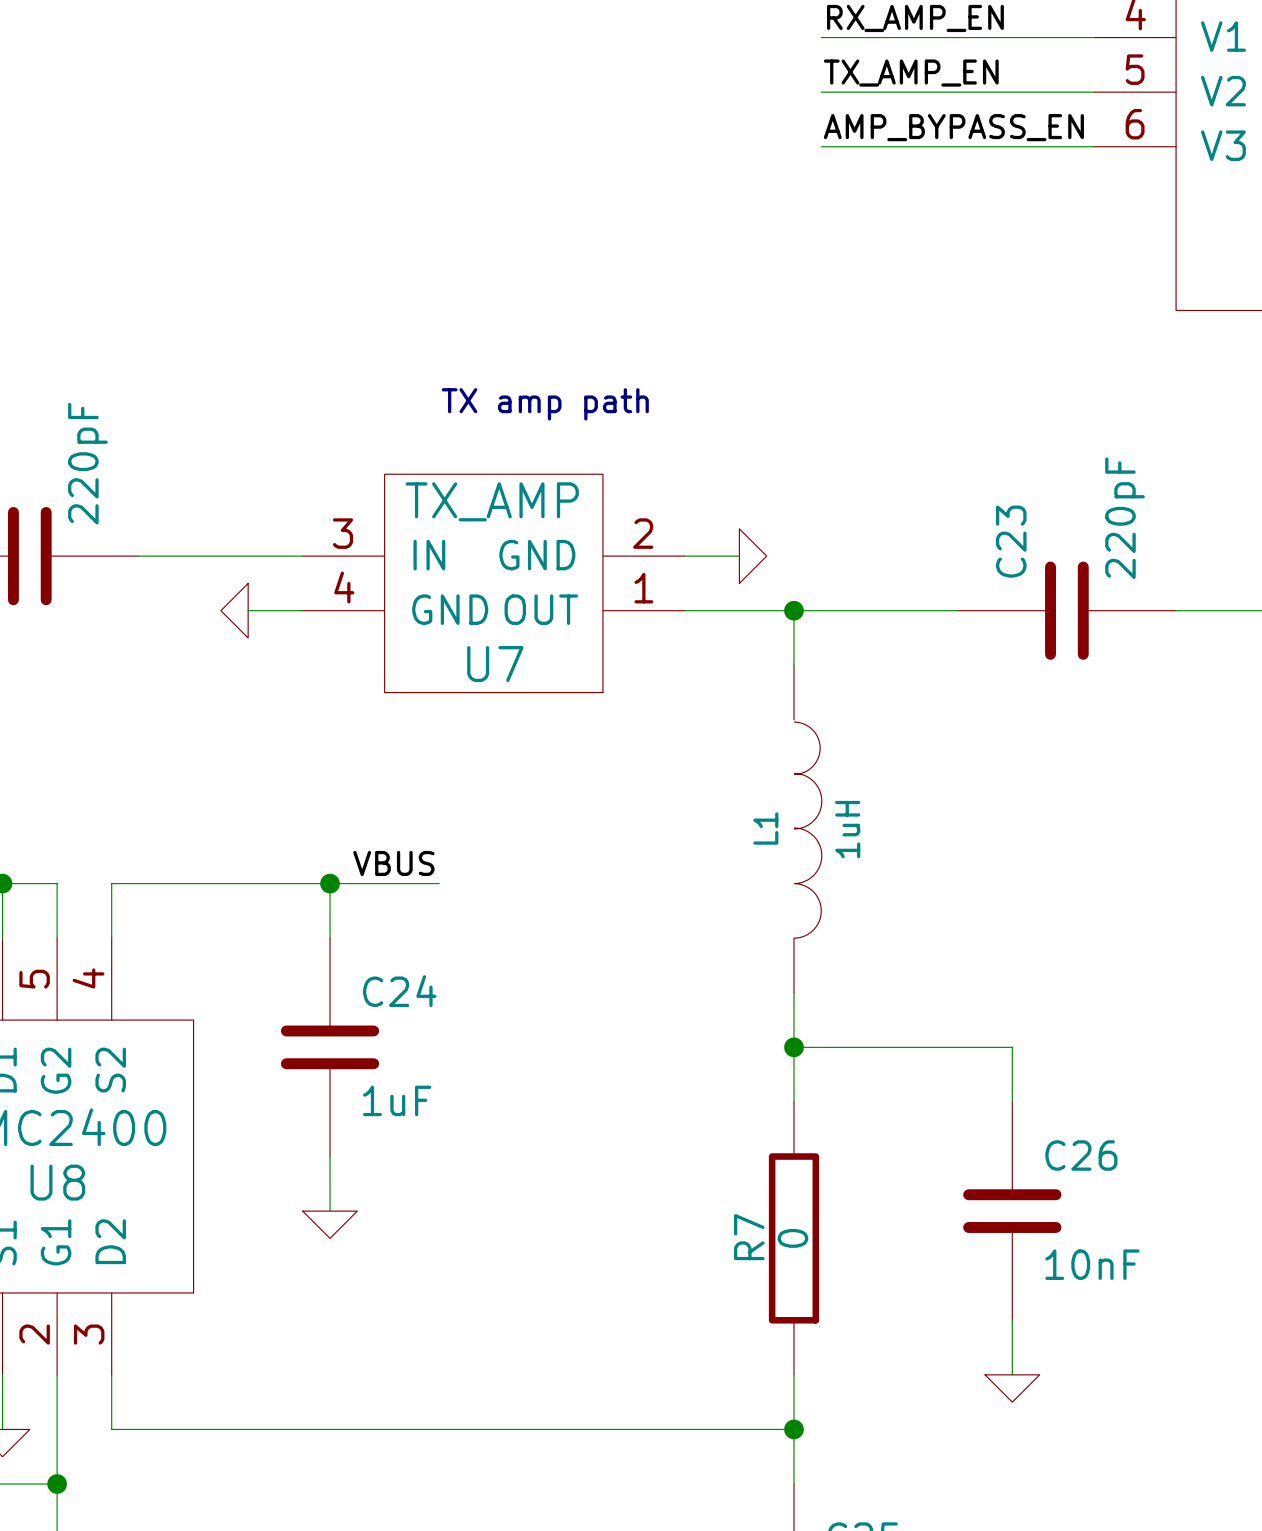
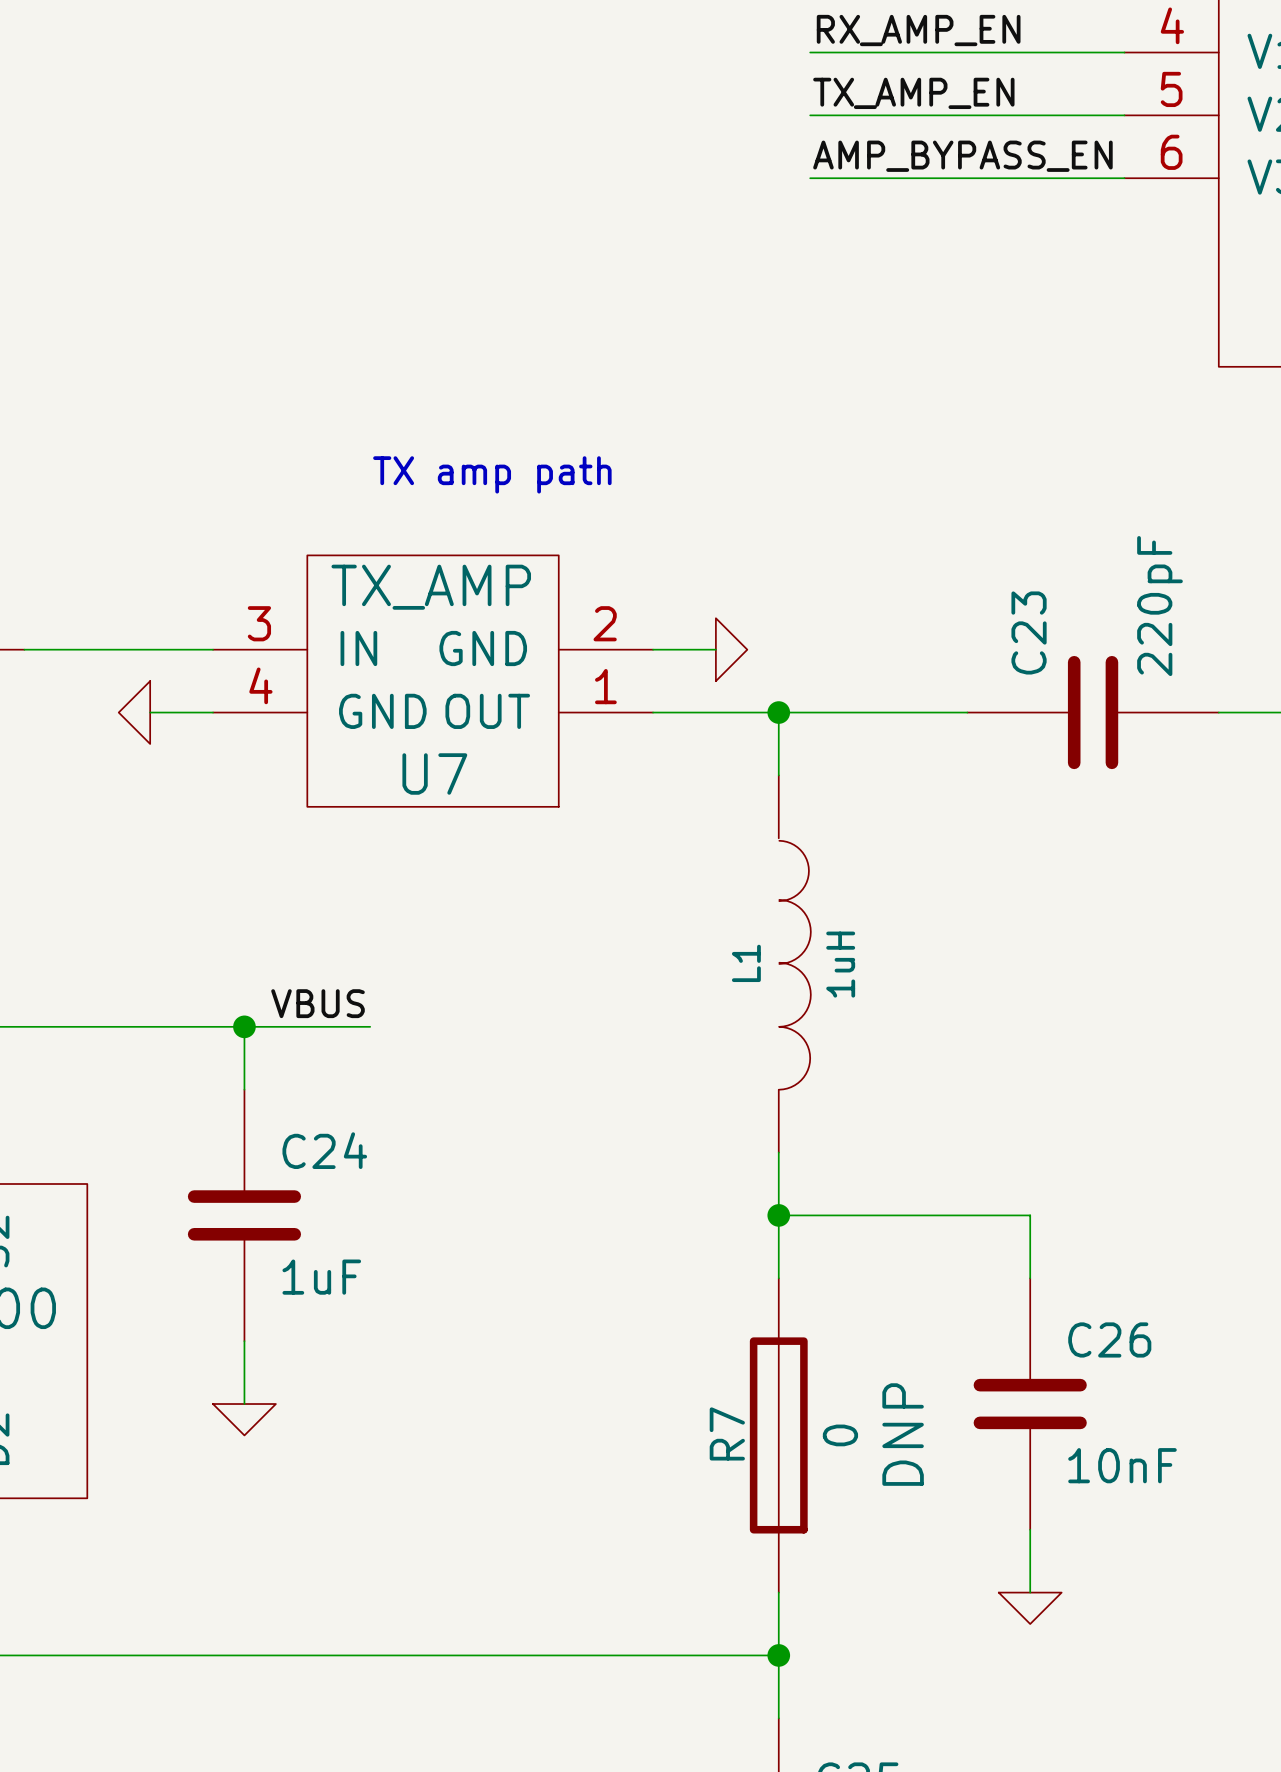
R7 symbol: [768, 1101, 820, 1375] -> [749, 1278, 808, 1593]
R7 text: none -> DNP (903, 1434)
R7 value position: 0 (792, 1238) -> 0 (840, 1435)

